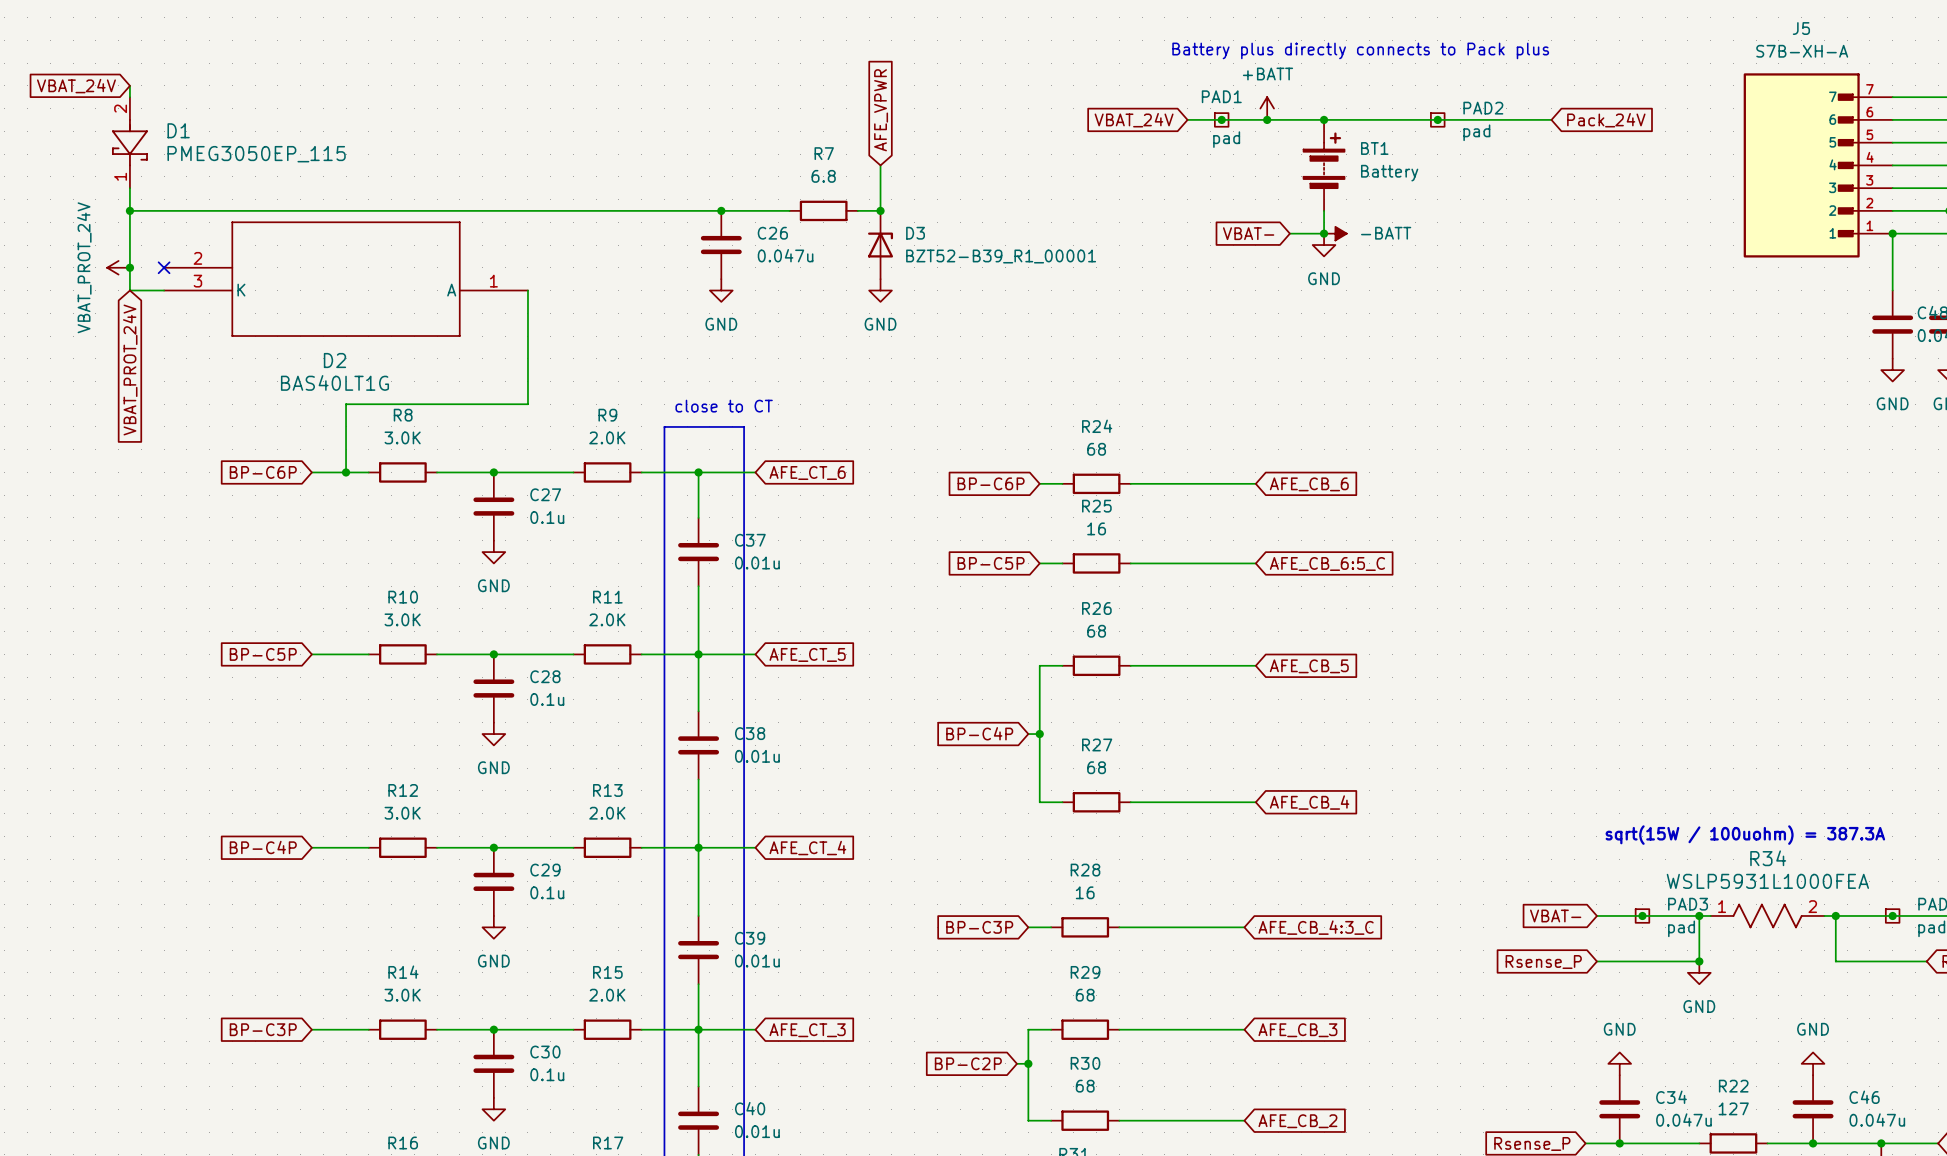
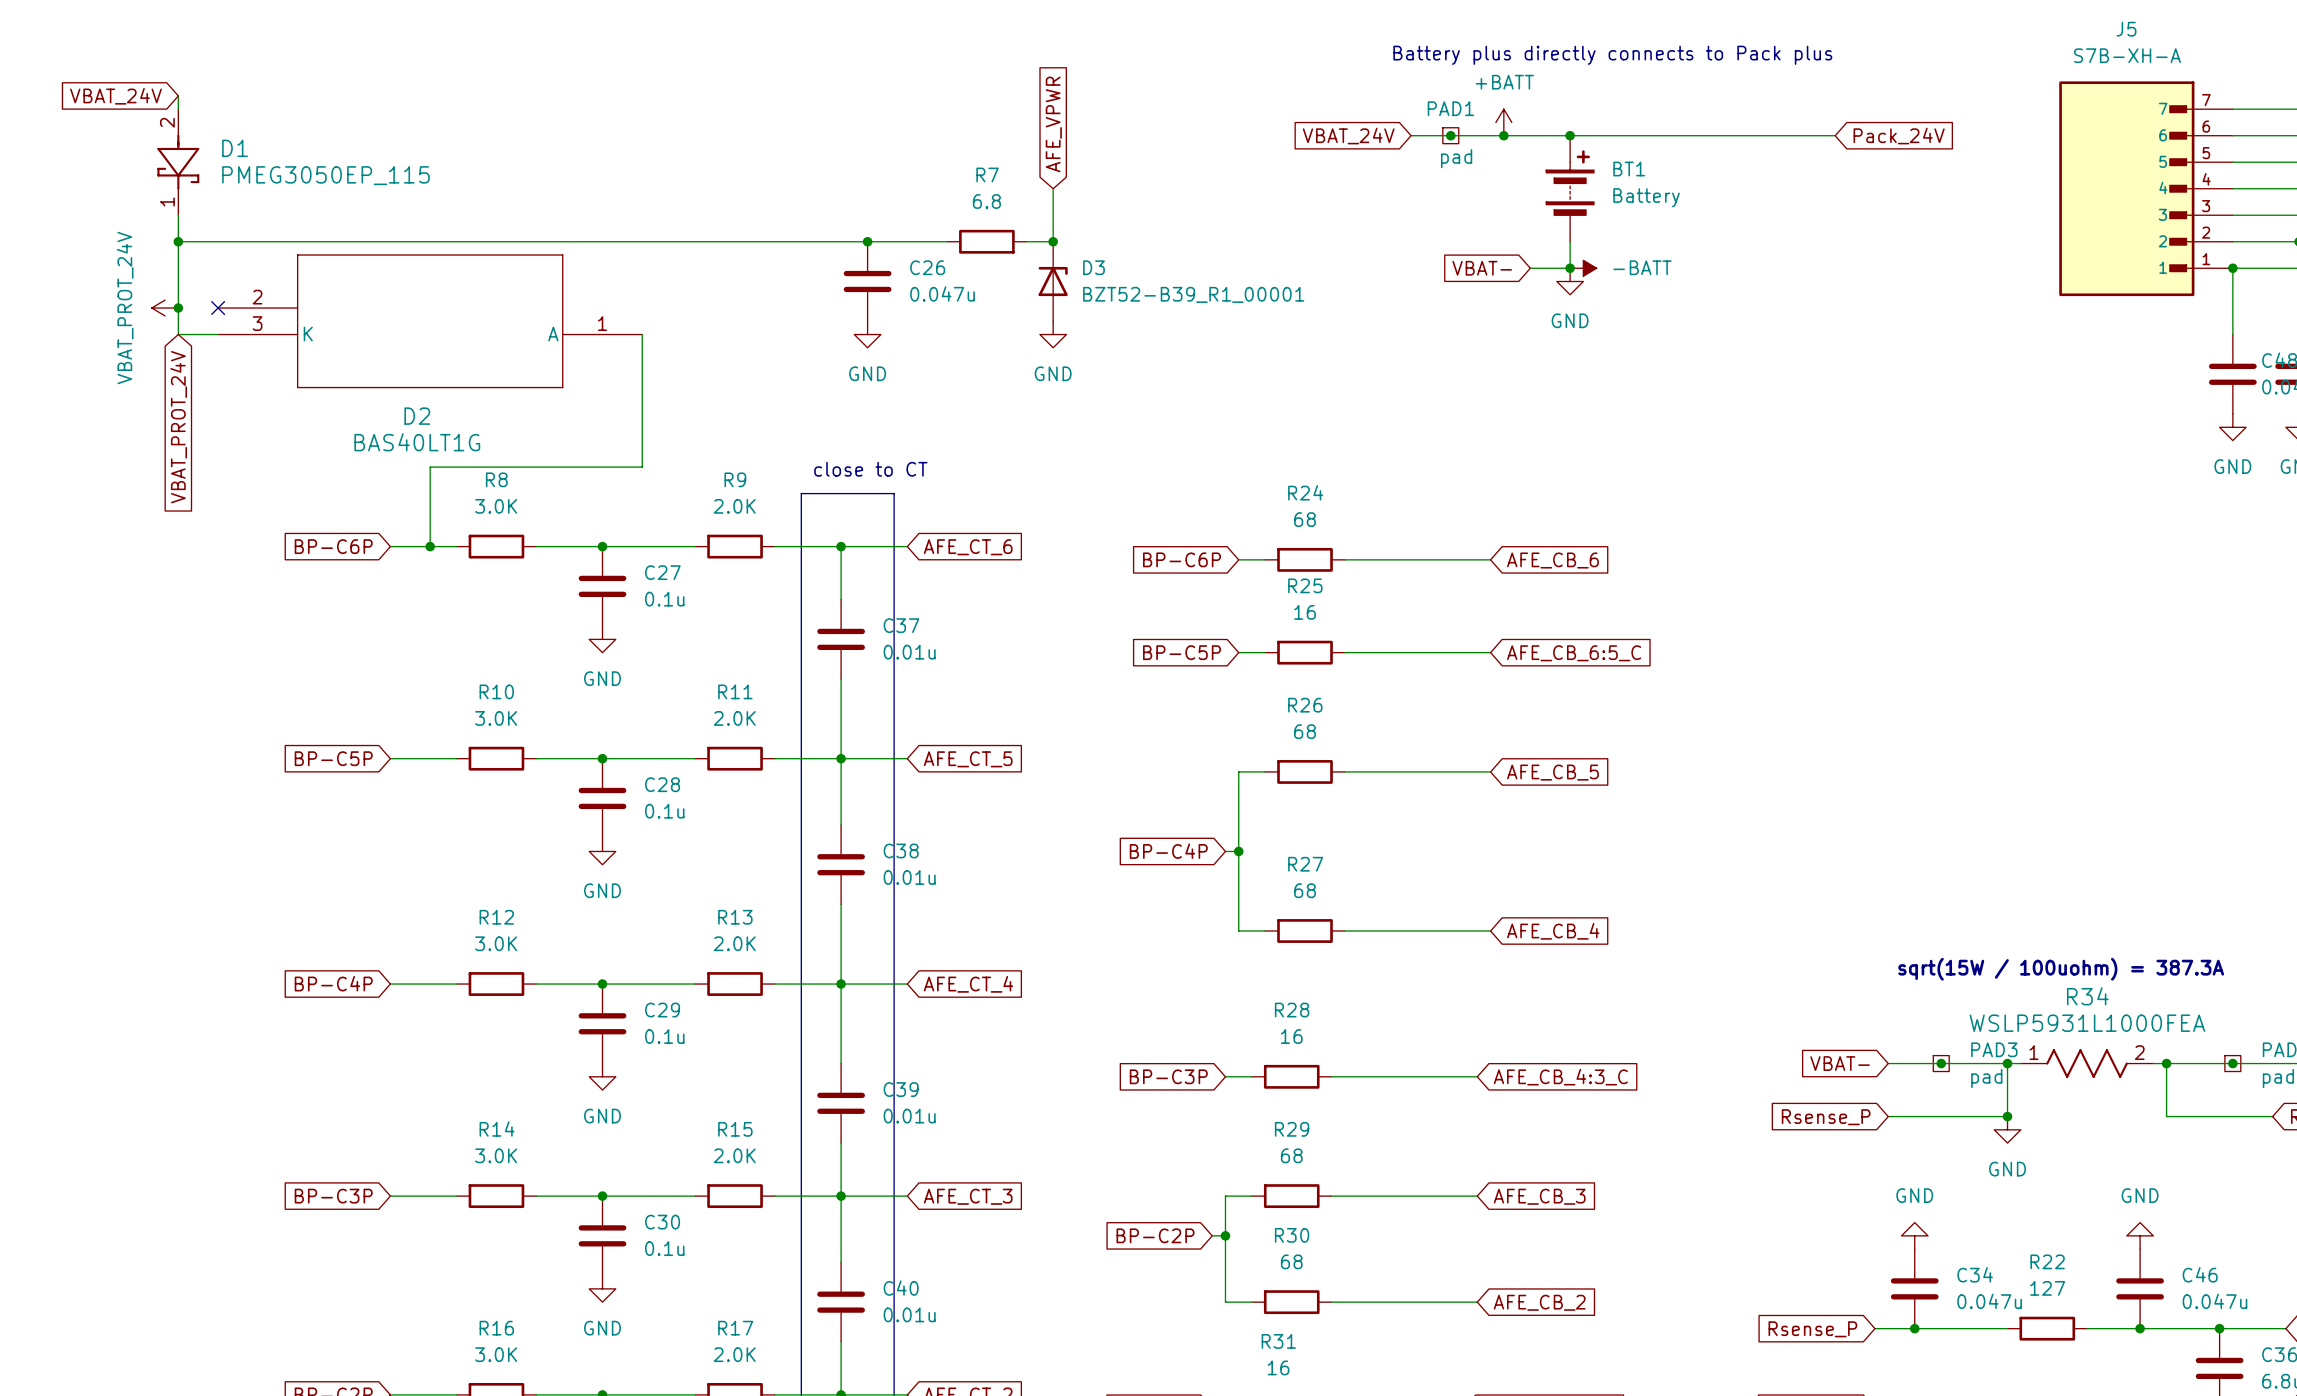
junction: (1437, 119) -> none
PAD2: pad (1437, 119) -> none

